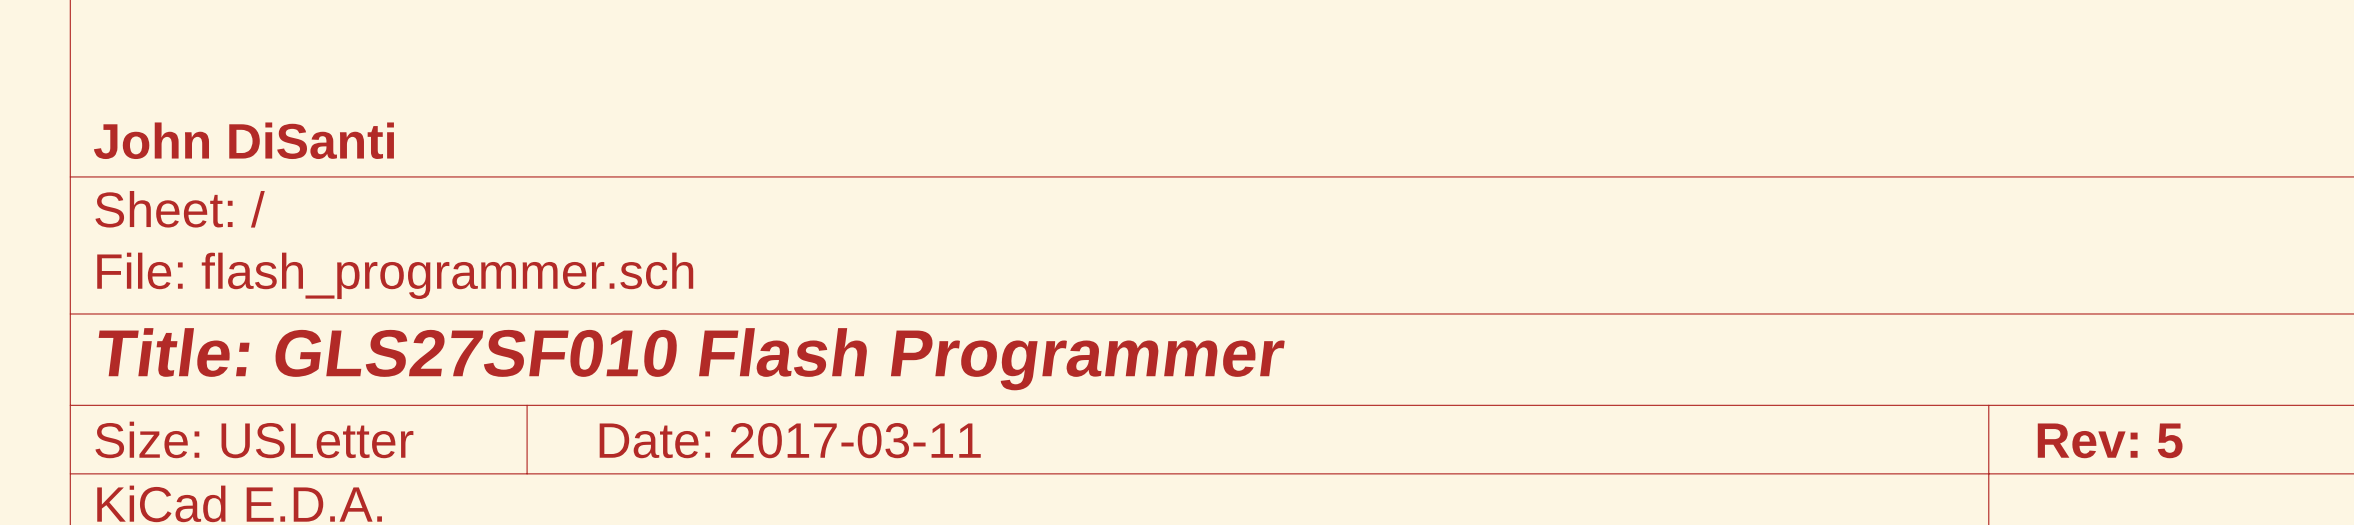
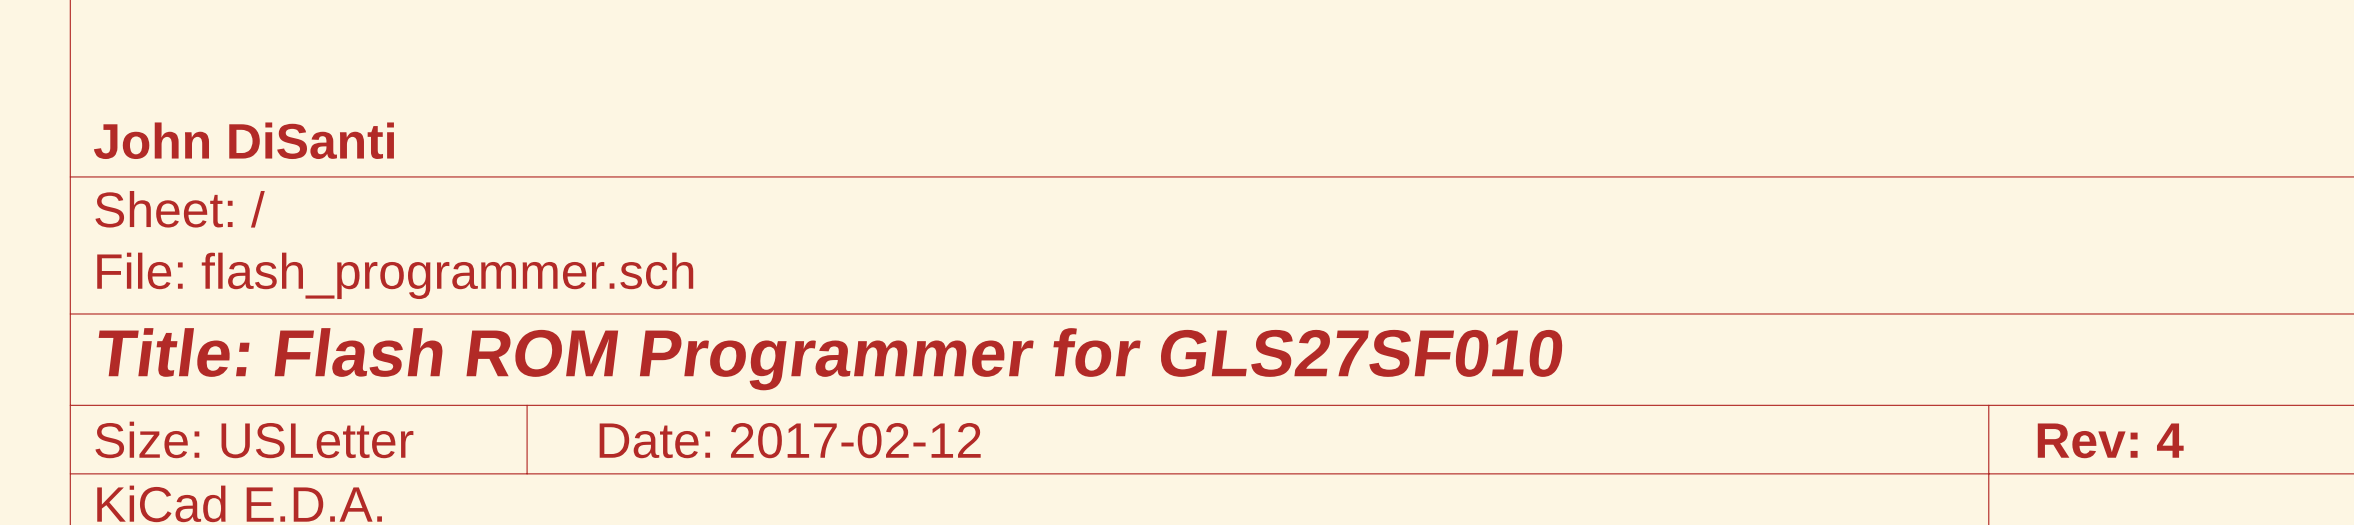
title block: Title: GLS27SF010 Flash Programmer (691, 359) -> Title: Flash ROM Programmer for GLS27SF010 (830, 359)
title block: Date: 2017-03-11 (790, 440) -> Date: 2017-02-12 (790, 440)
title block: Rev: 5 (2110, 440) -> Rev: 4 (2110, 440)

